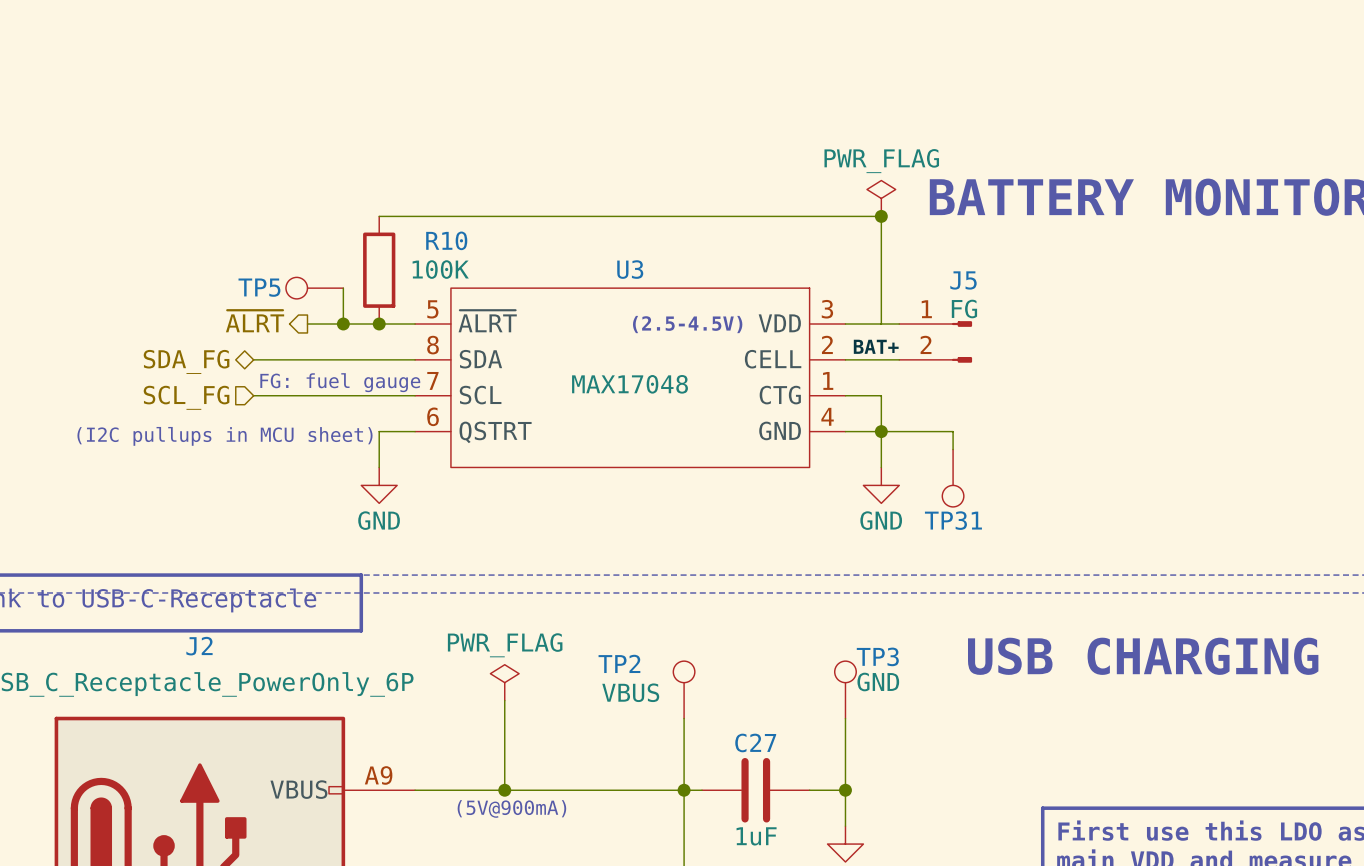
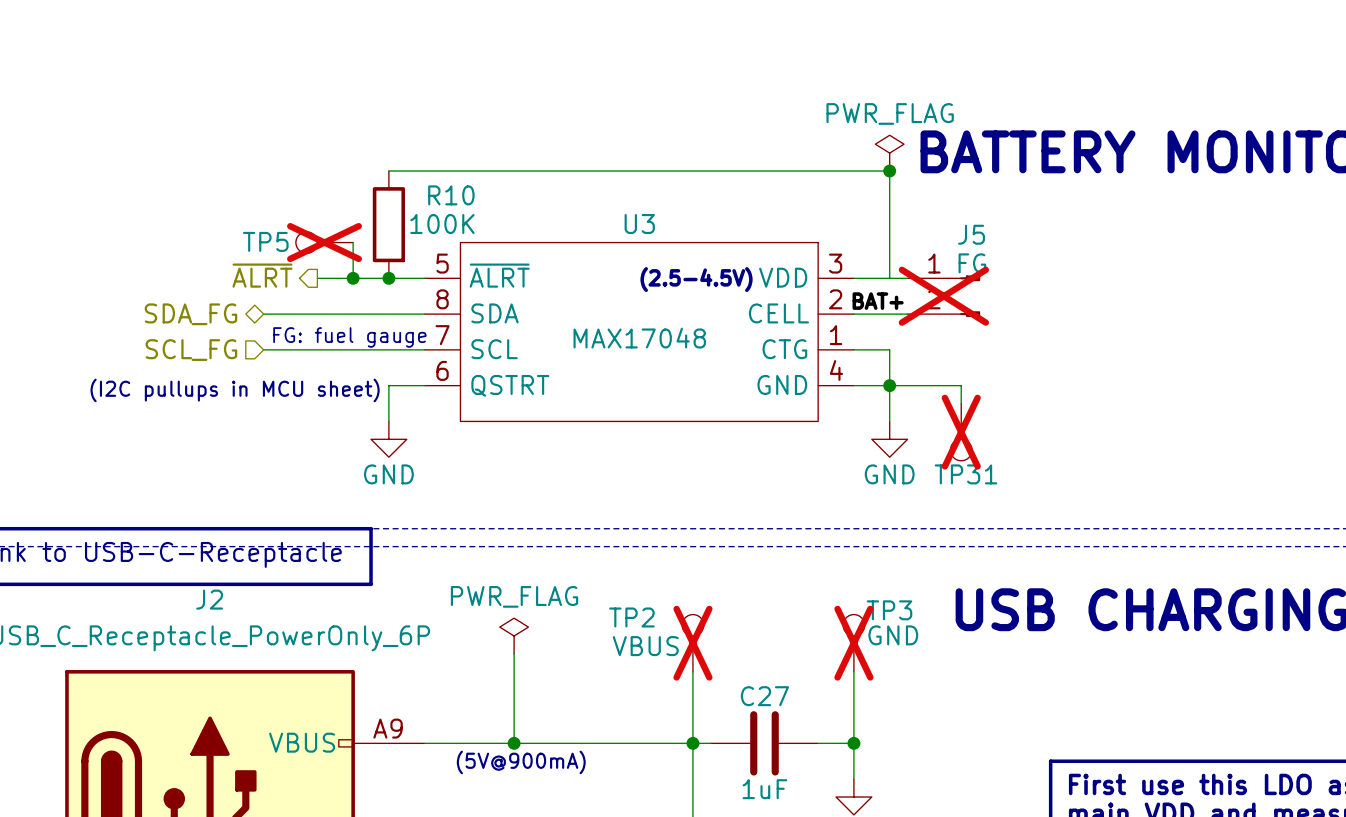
TP5 do-not-place cross: none -> (324, 242)
J5 do-not-place cross: none -> (943, 296)
TP31 do-not-place cross: none -> (961, 432)
TP2 do-not-place cross: none -> (692, 643)
TP3 do-not-place cross: none -> (853, 643)

